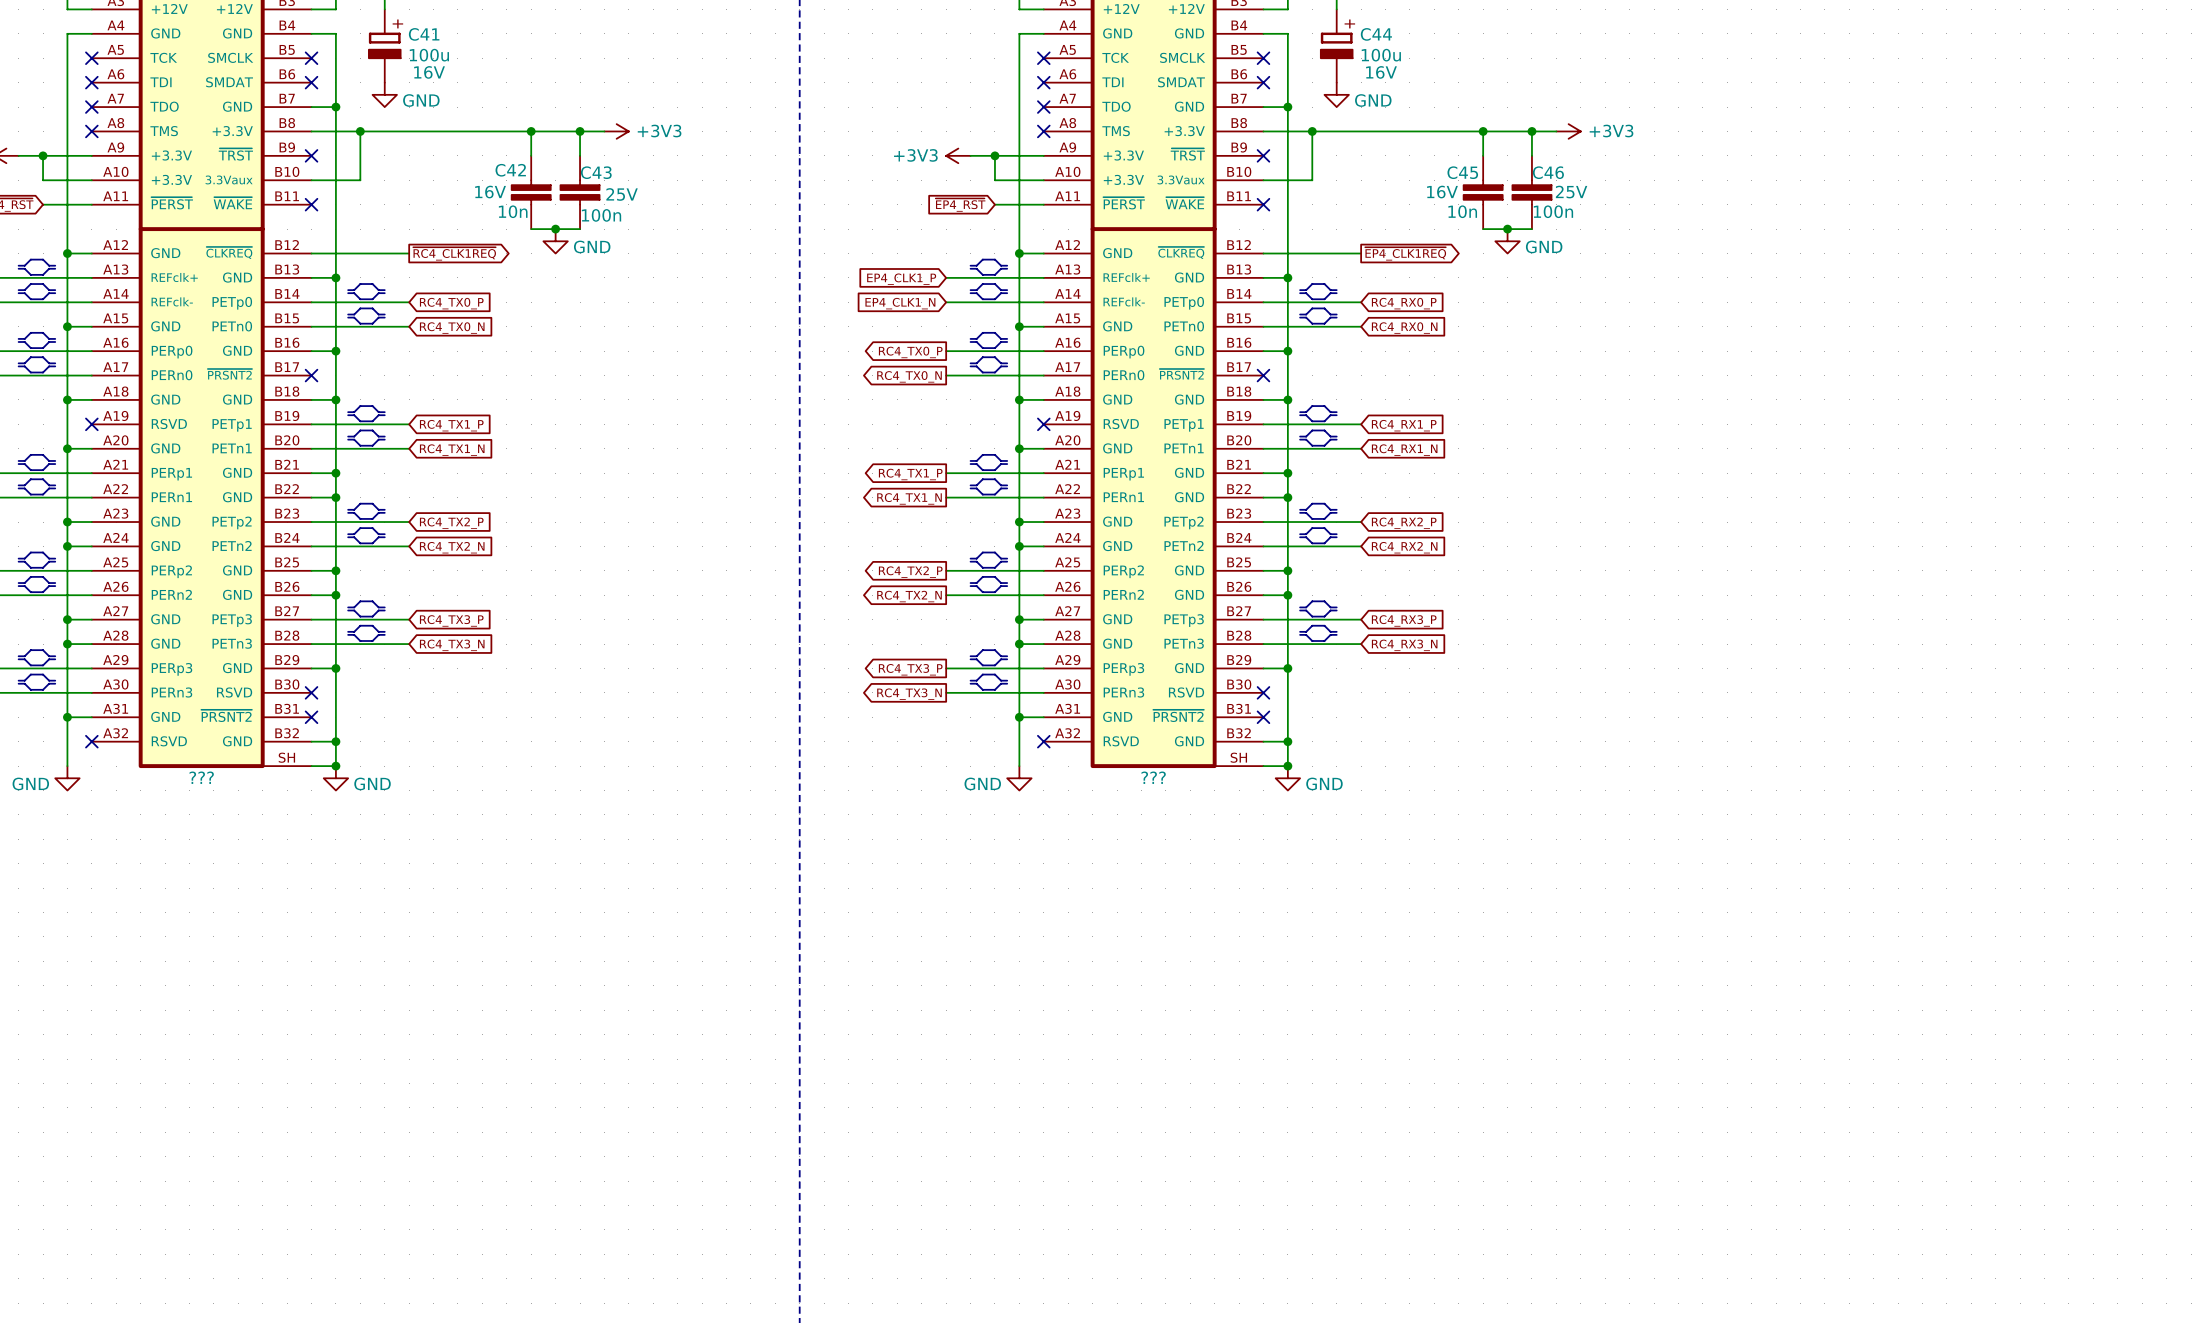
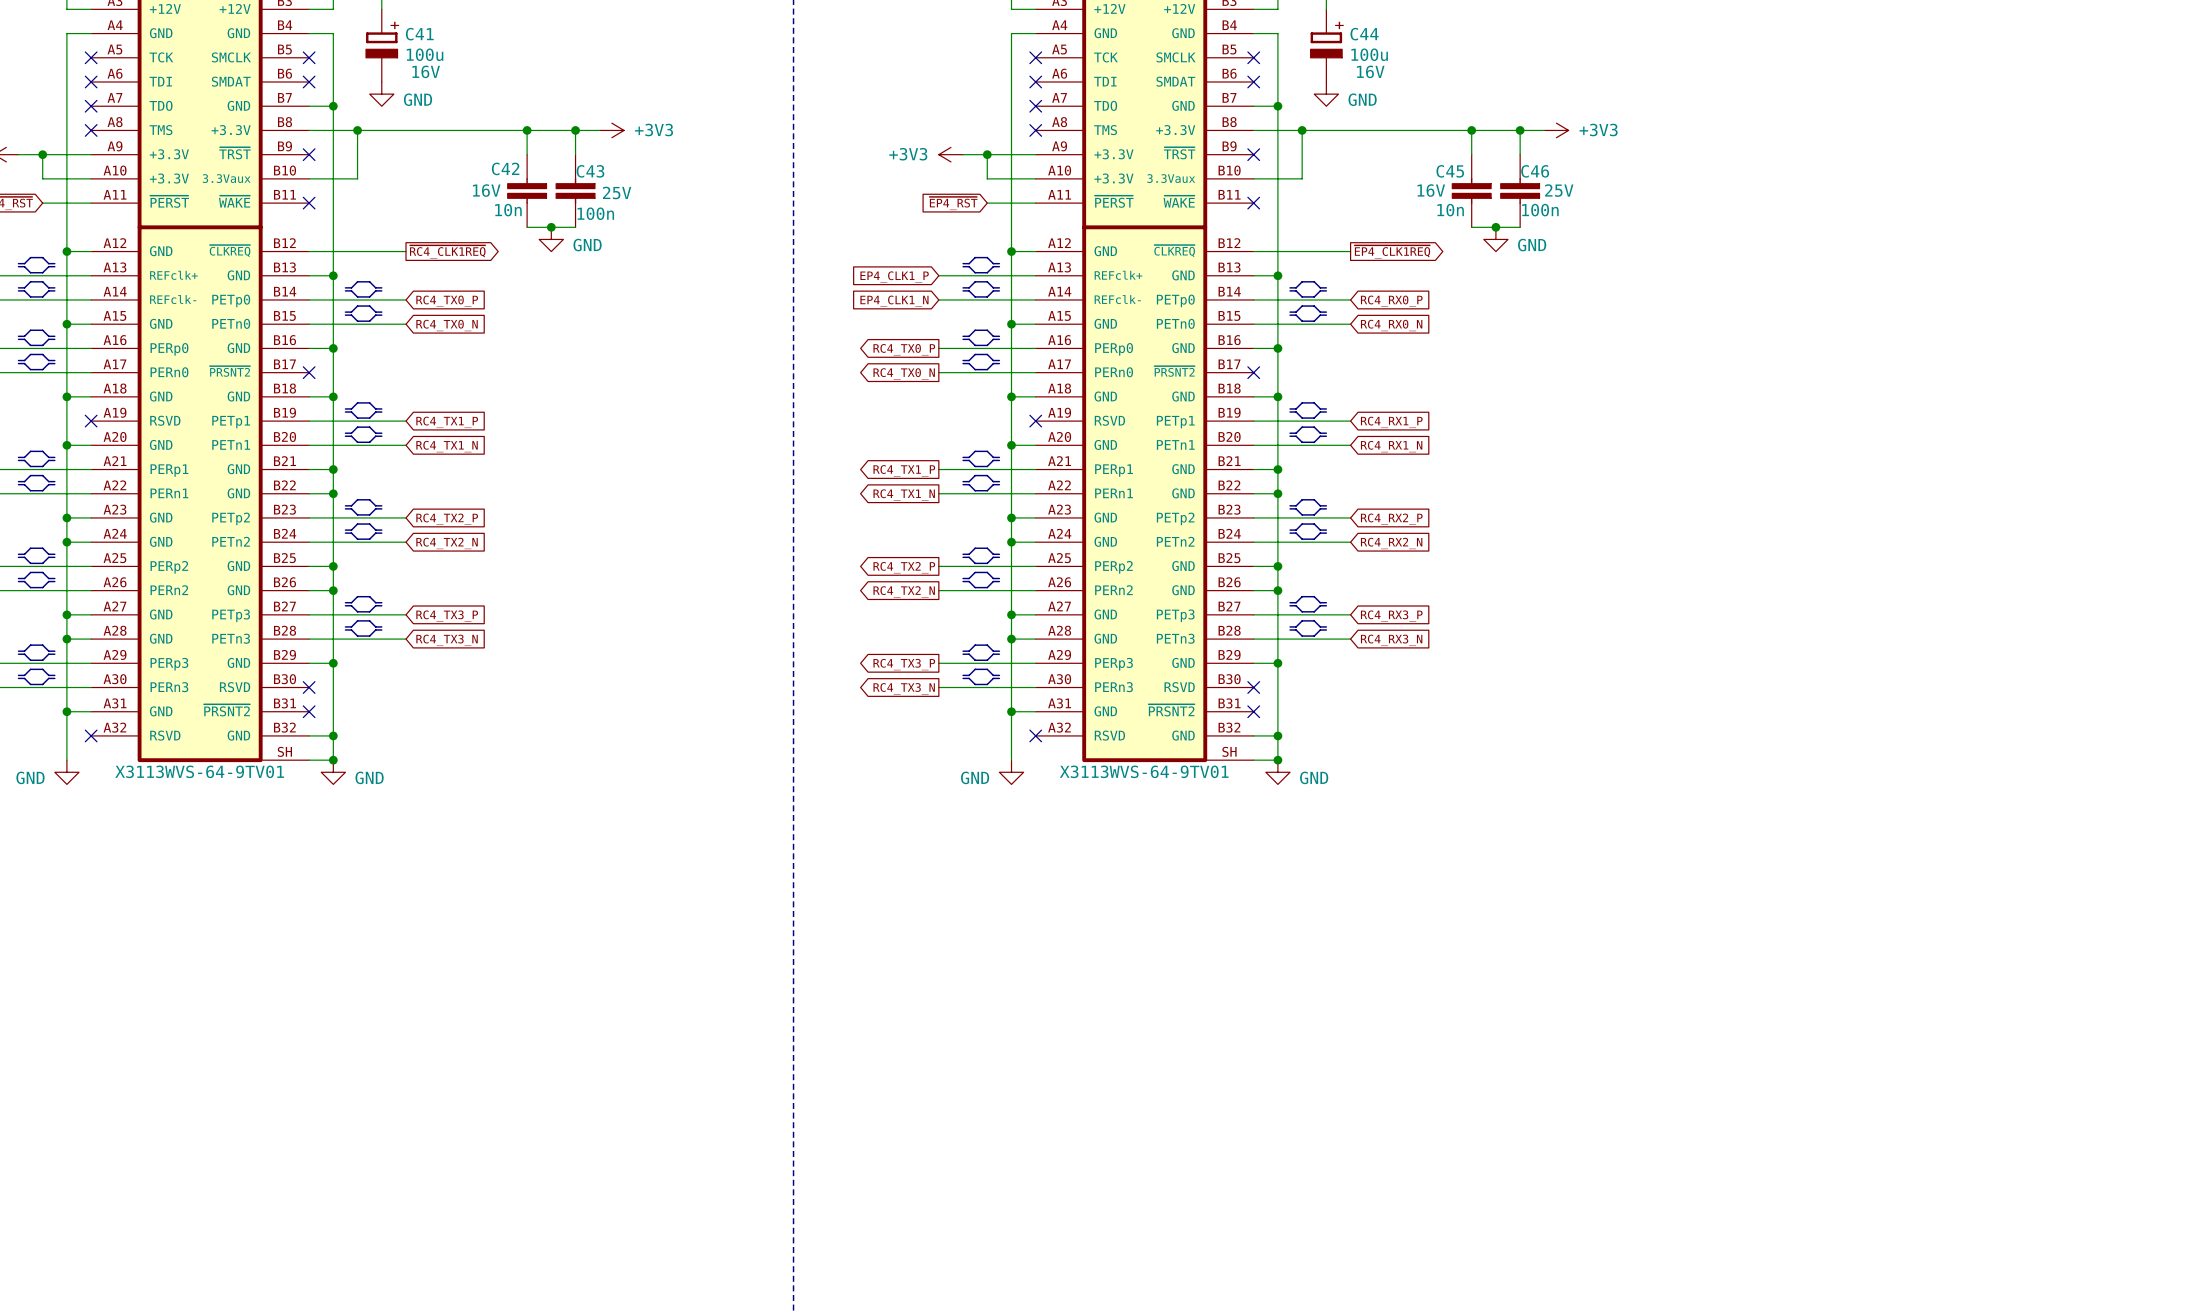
part value: ??? (201, 777) -> X3113WVS-64-9TV01 (199, 771)
part value: ??? (1153, 777) -> X3113WVS-64-9TV01 (1144, 771)

